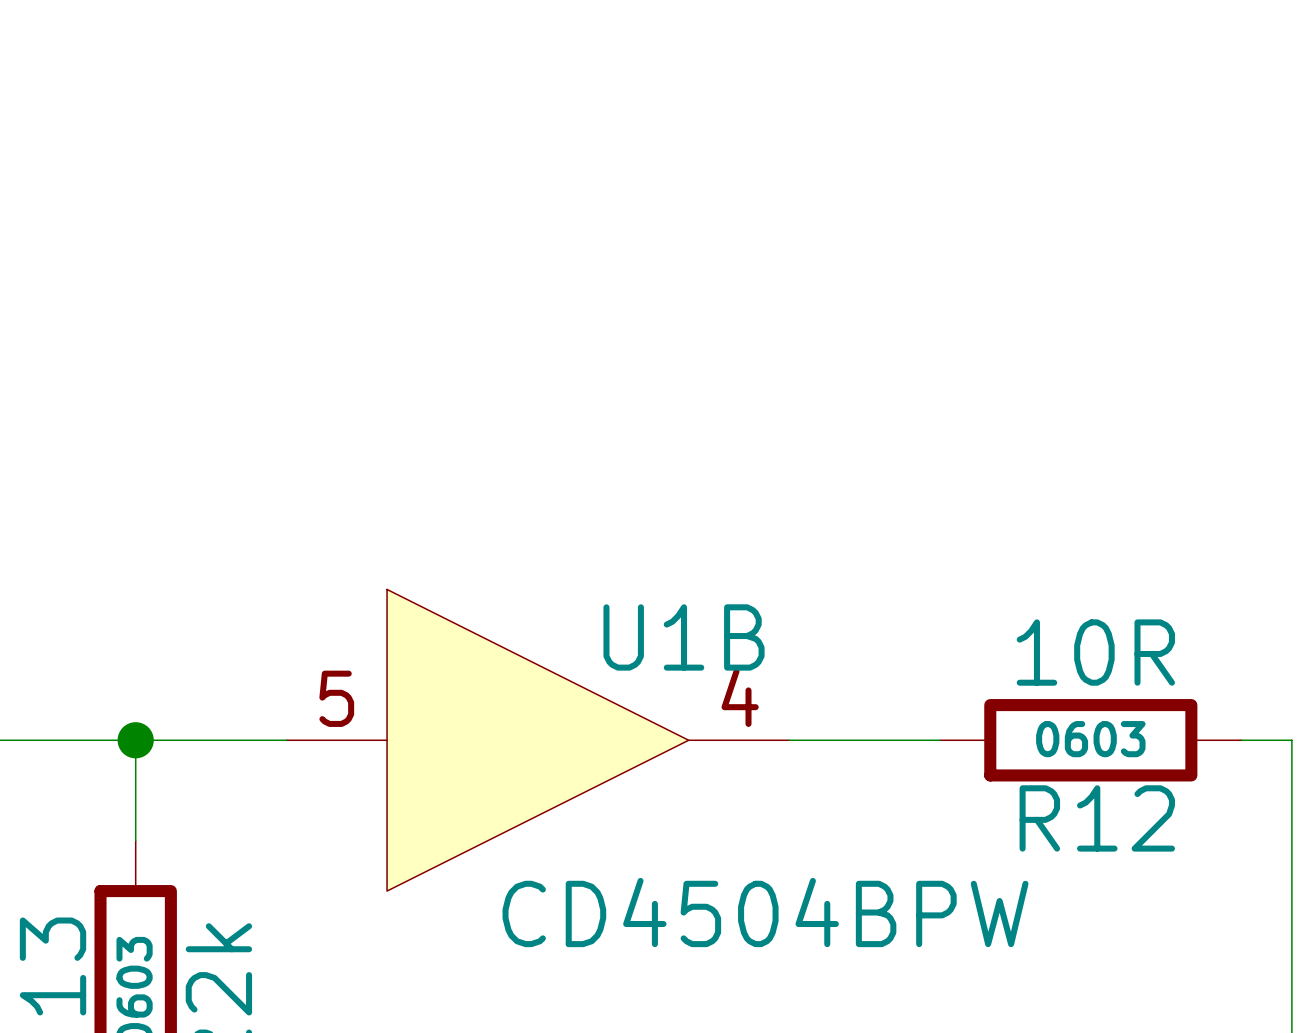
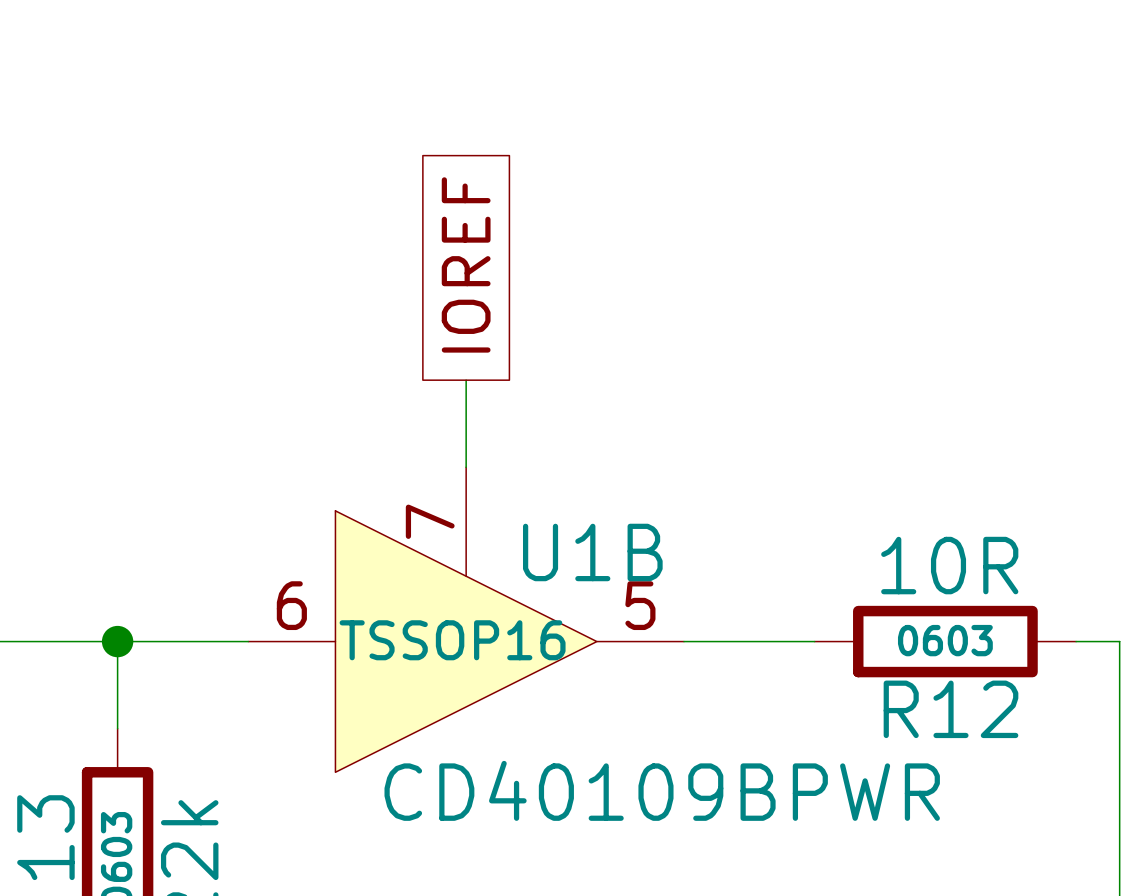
global label: none -> IOREF (466, 264)
wire: none -> (466, 380) (466, 467)
U1B symbol: [286, 589, 790, 892] -> [248, 467, 684, 773]
U1B text: none -> TSSOP16 (452, 640)
U1B value: CD4504BPW (765, 912) -> CD40109BPWR (662, 790)

